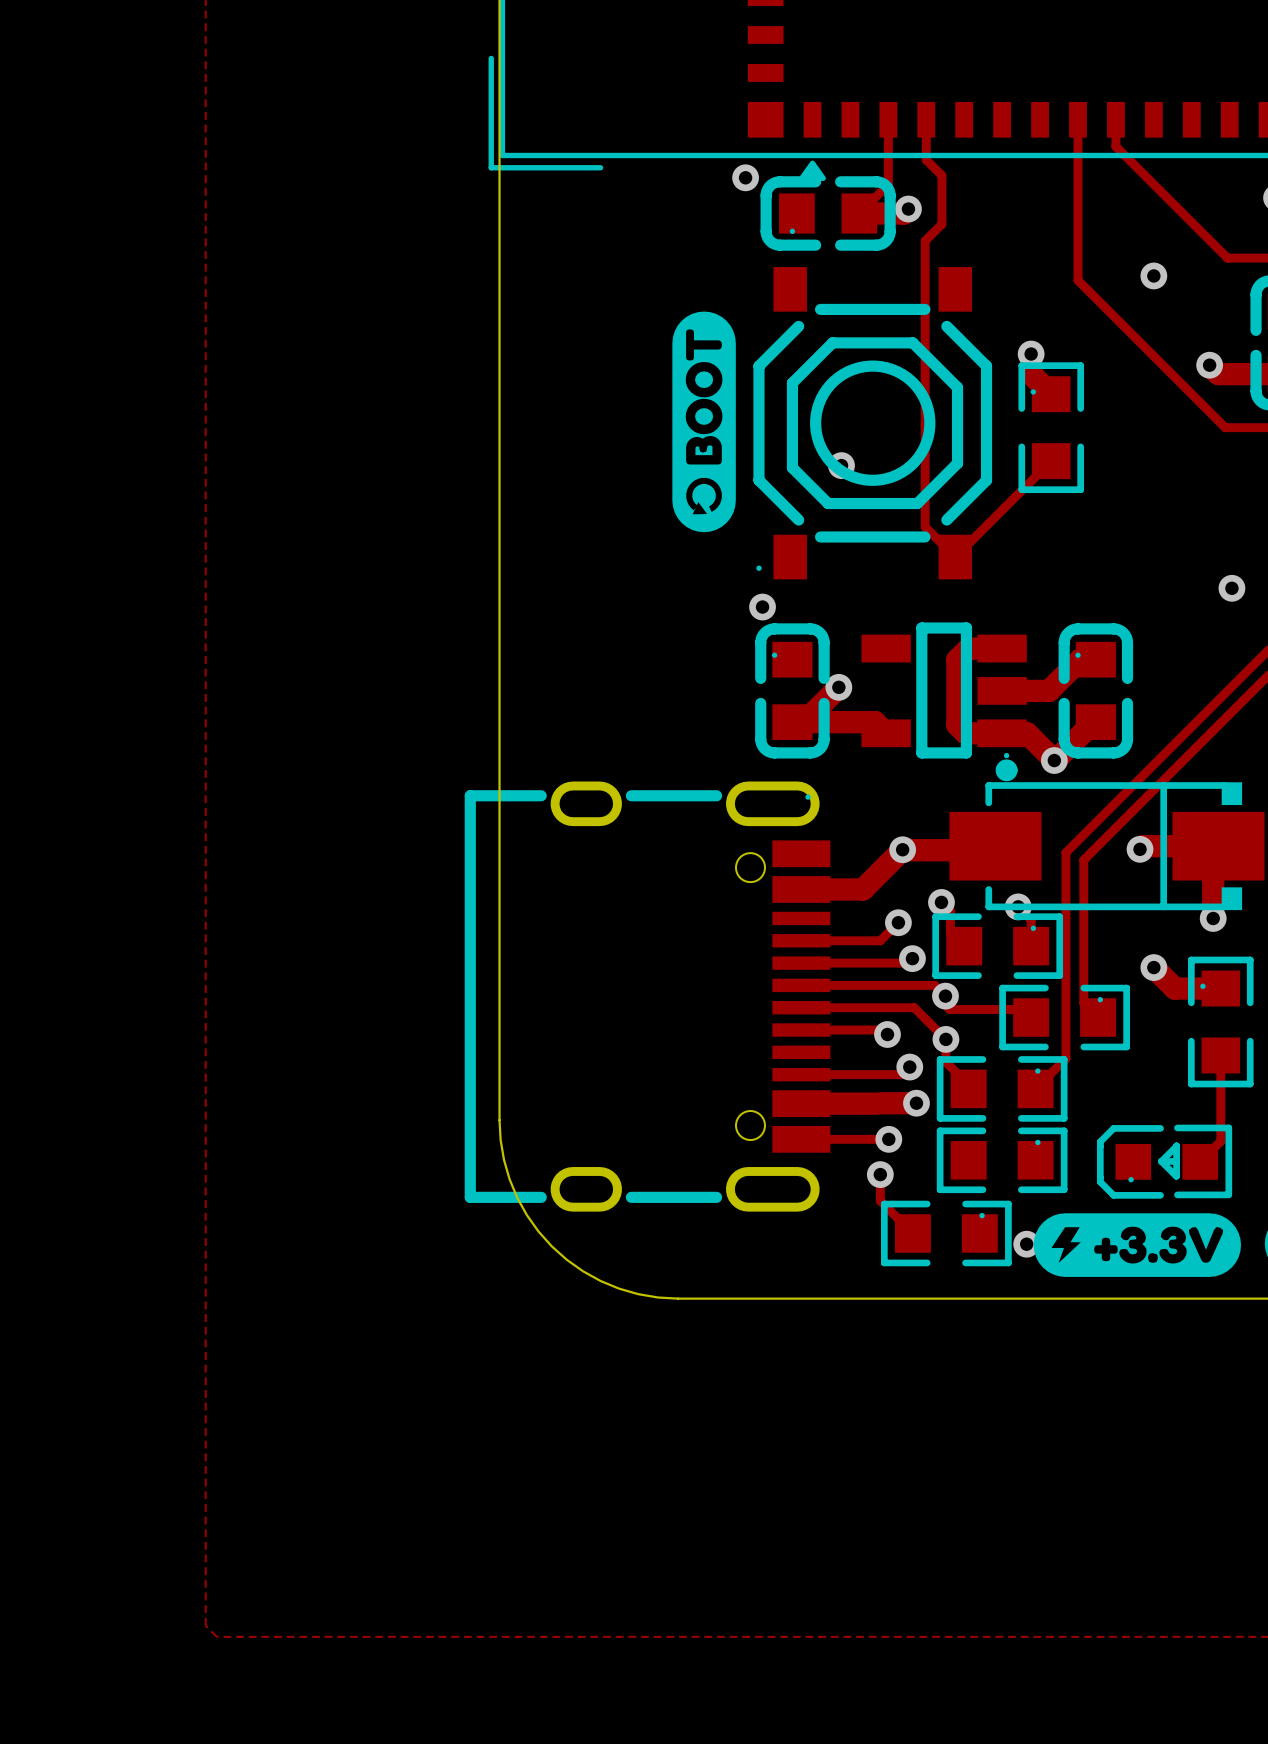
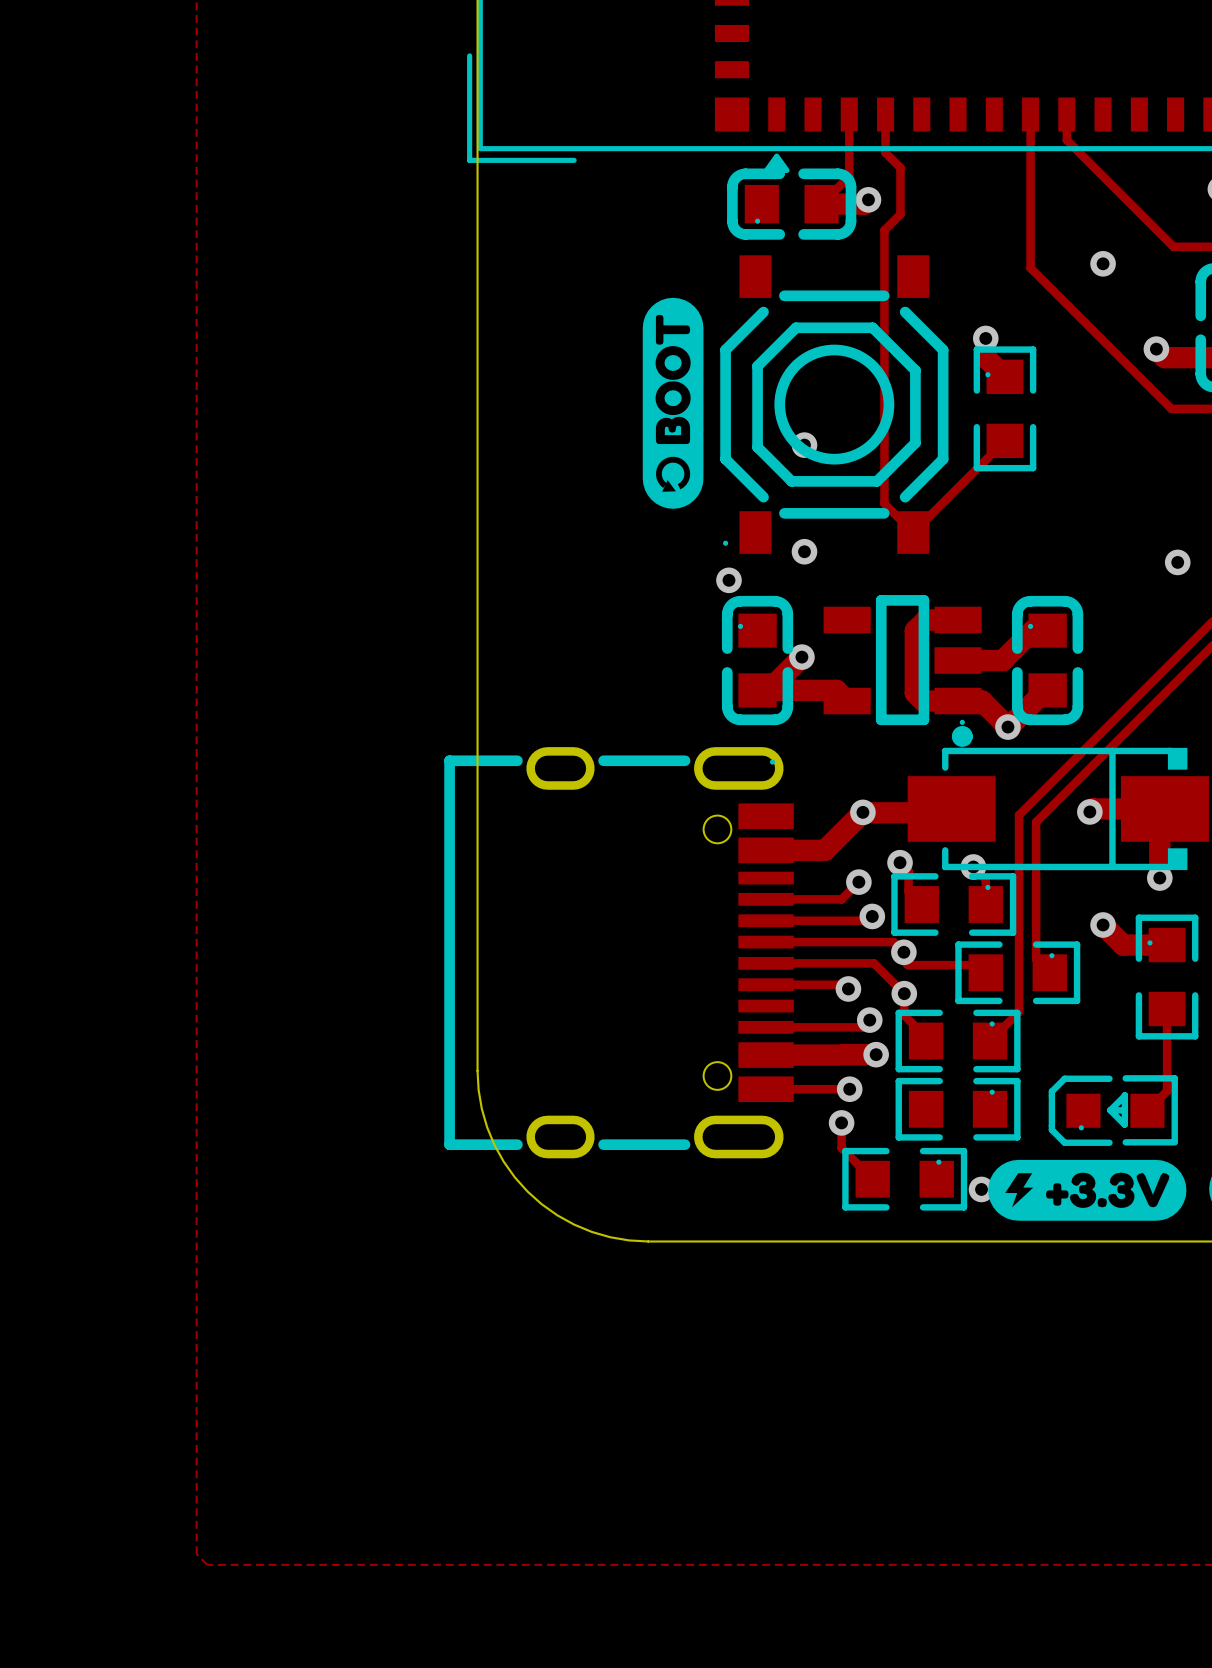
via: (745, 177) -> none
via: none -> (804, 551)

